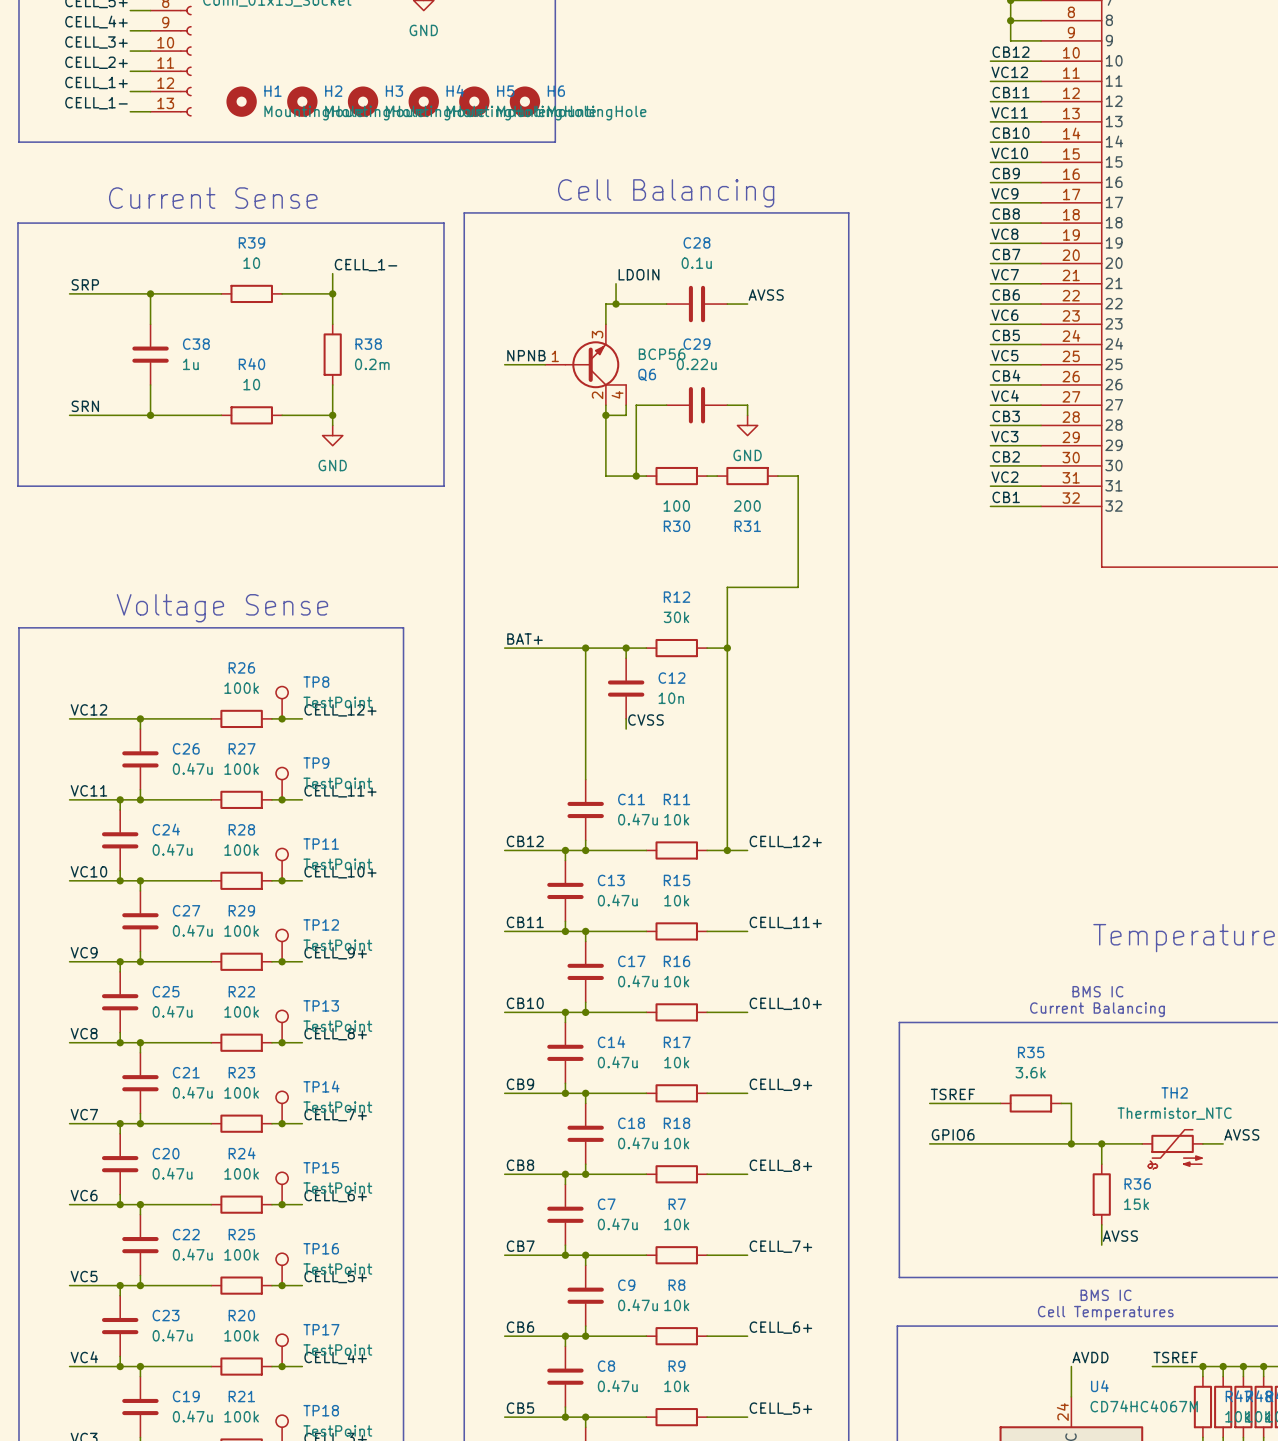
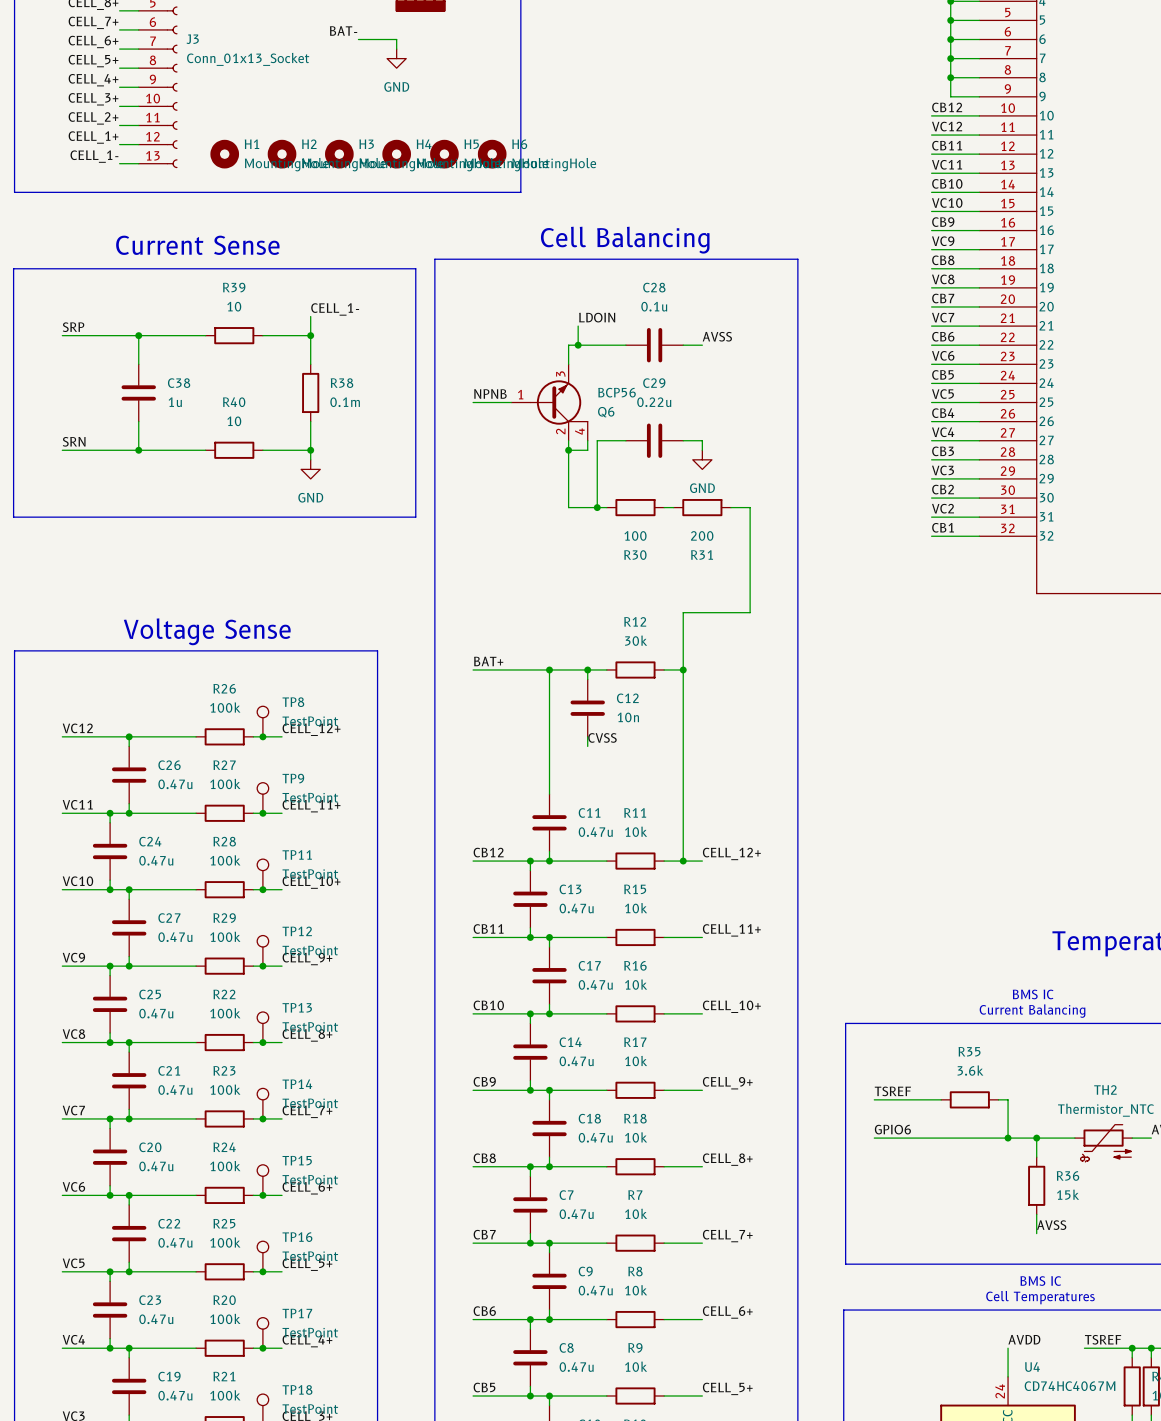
R38 value: 0.2m (372, 364) -> 0.1m (345, 402)

